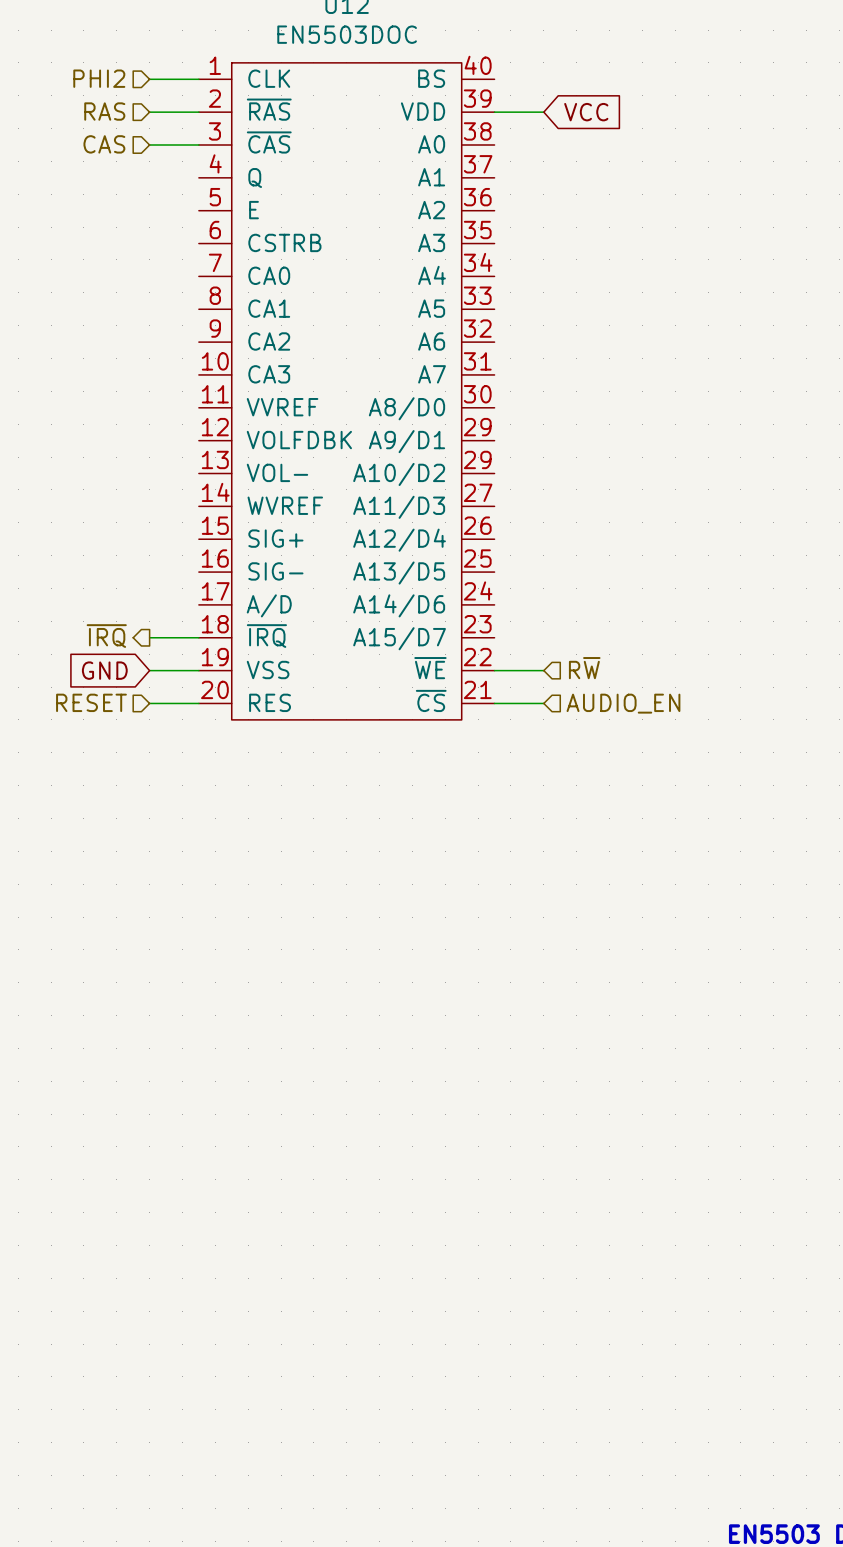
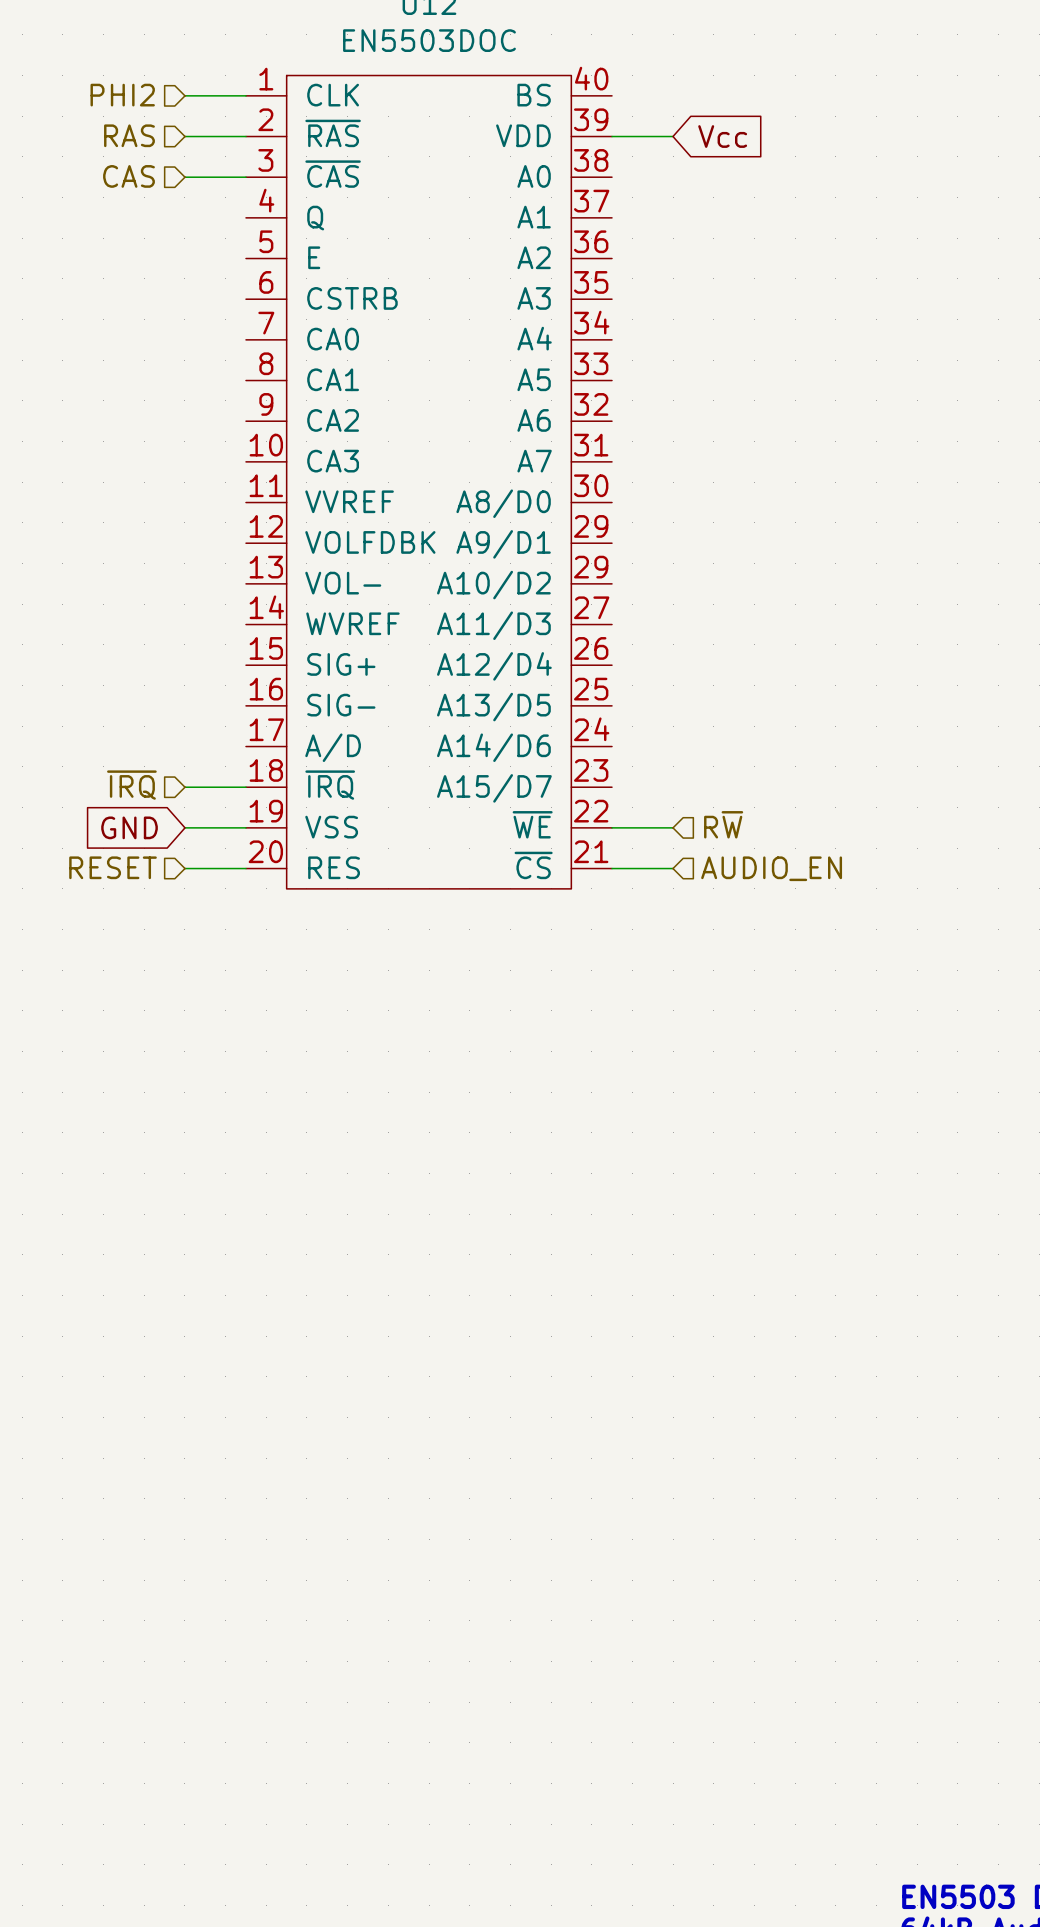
global label: VCC (586, 112) -> Vcc (722, 136)
hierarchical label shape: output (106, 636) -> input (131, 785)

